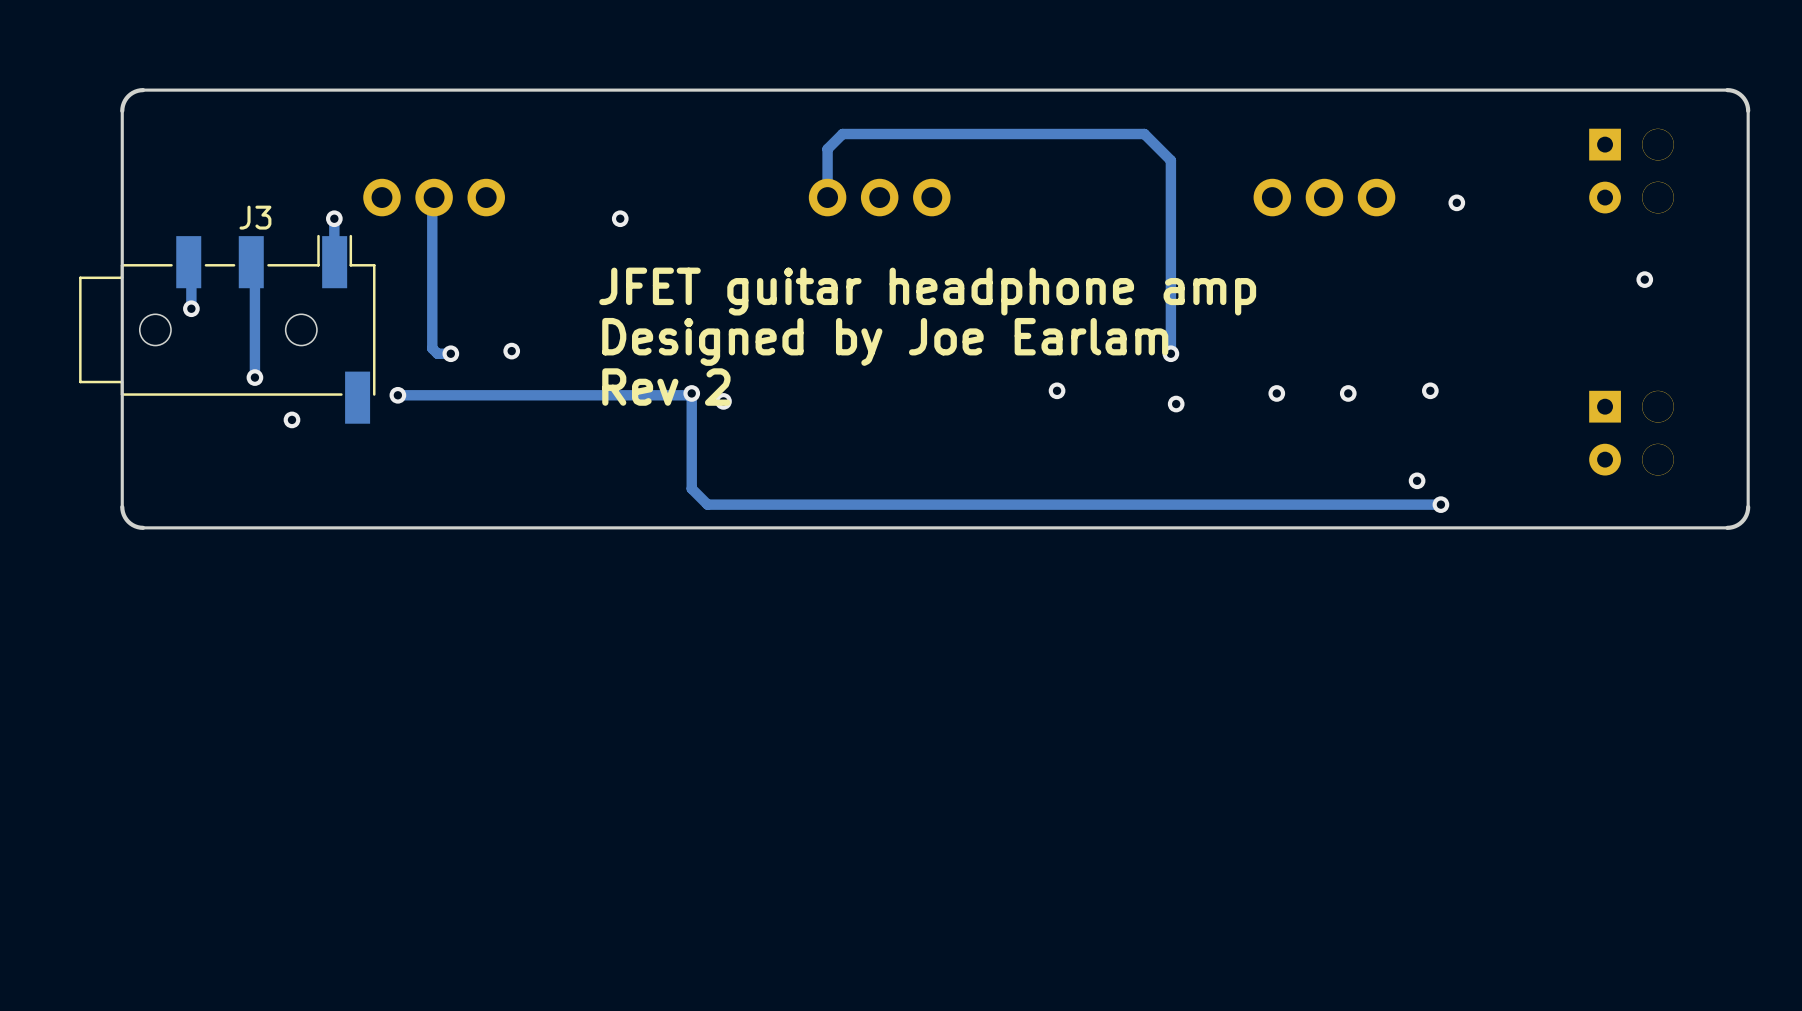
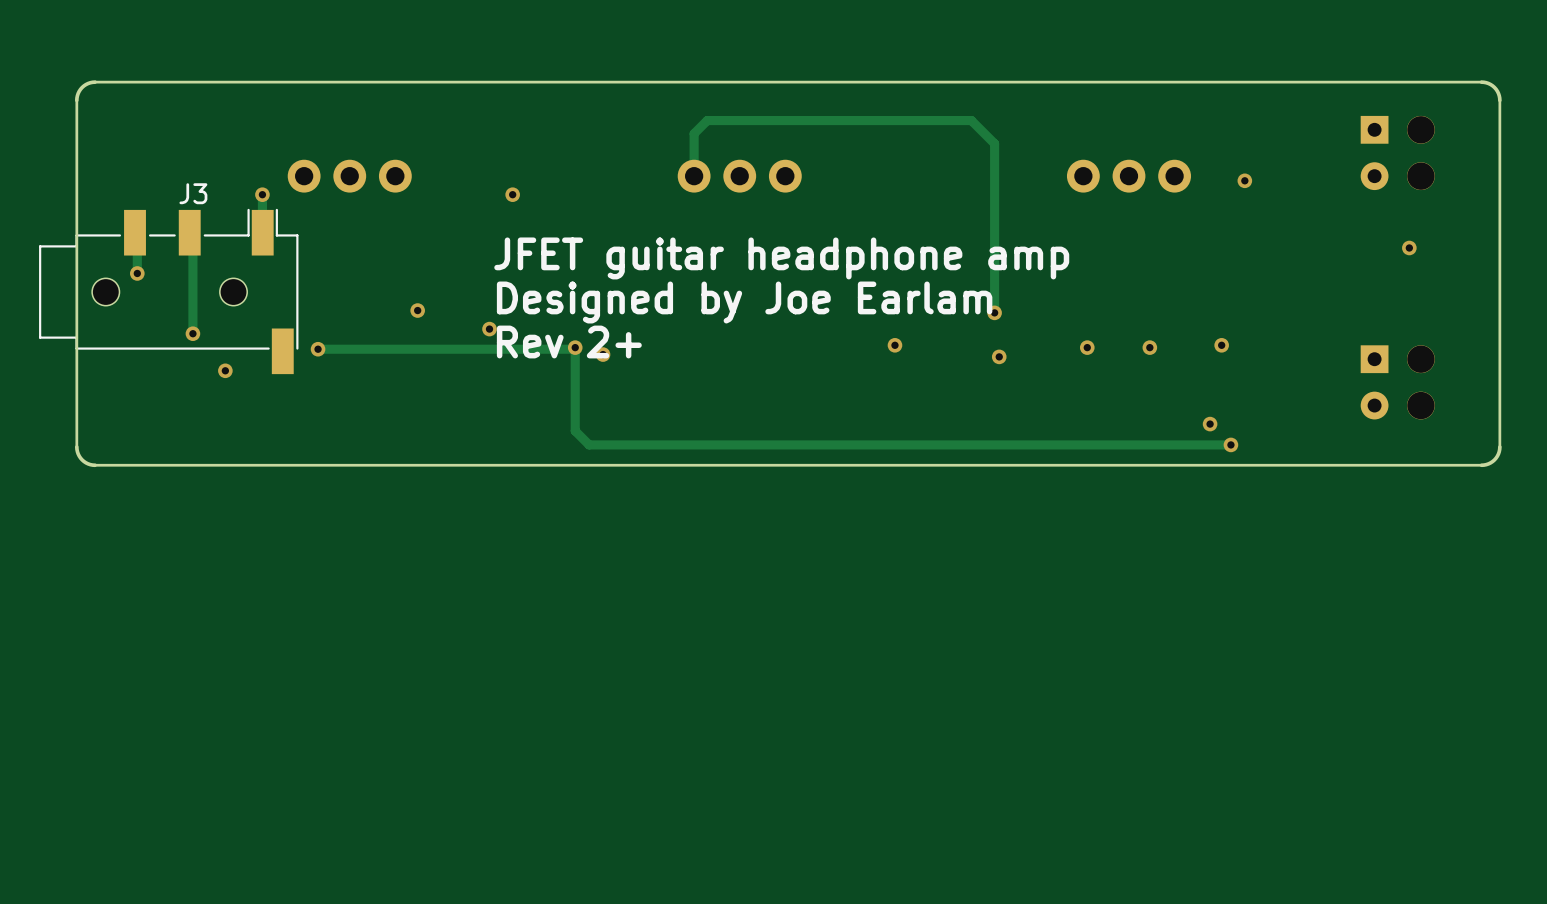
track: (434, 197) (432, 199) (432, 348) (437, 353) (450, 353) -> none
via: (450, 353) -> none
via: none -> (489, 329)
text: Rev 2 (666, 387) -> Rev 2+ (569, 342)

